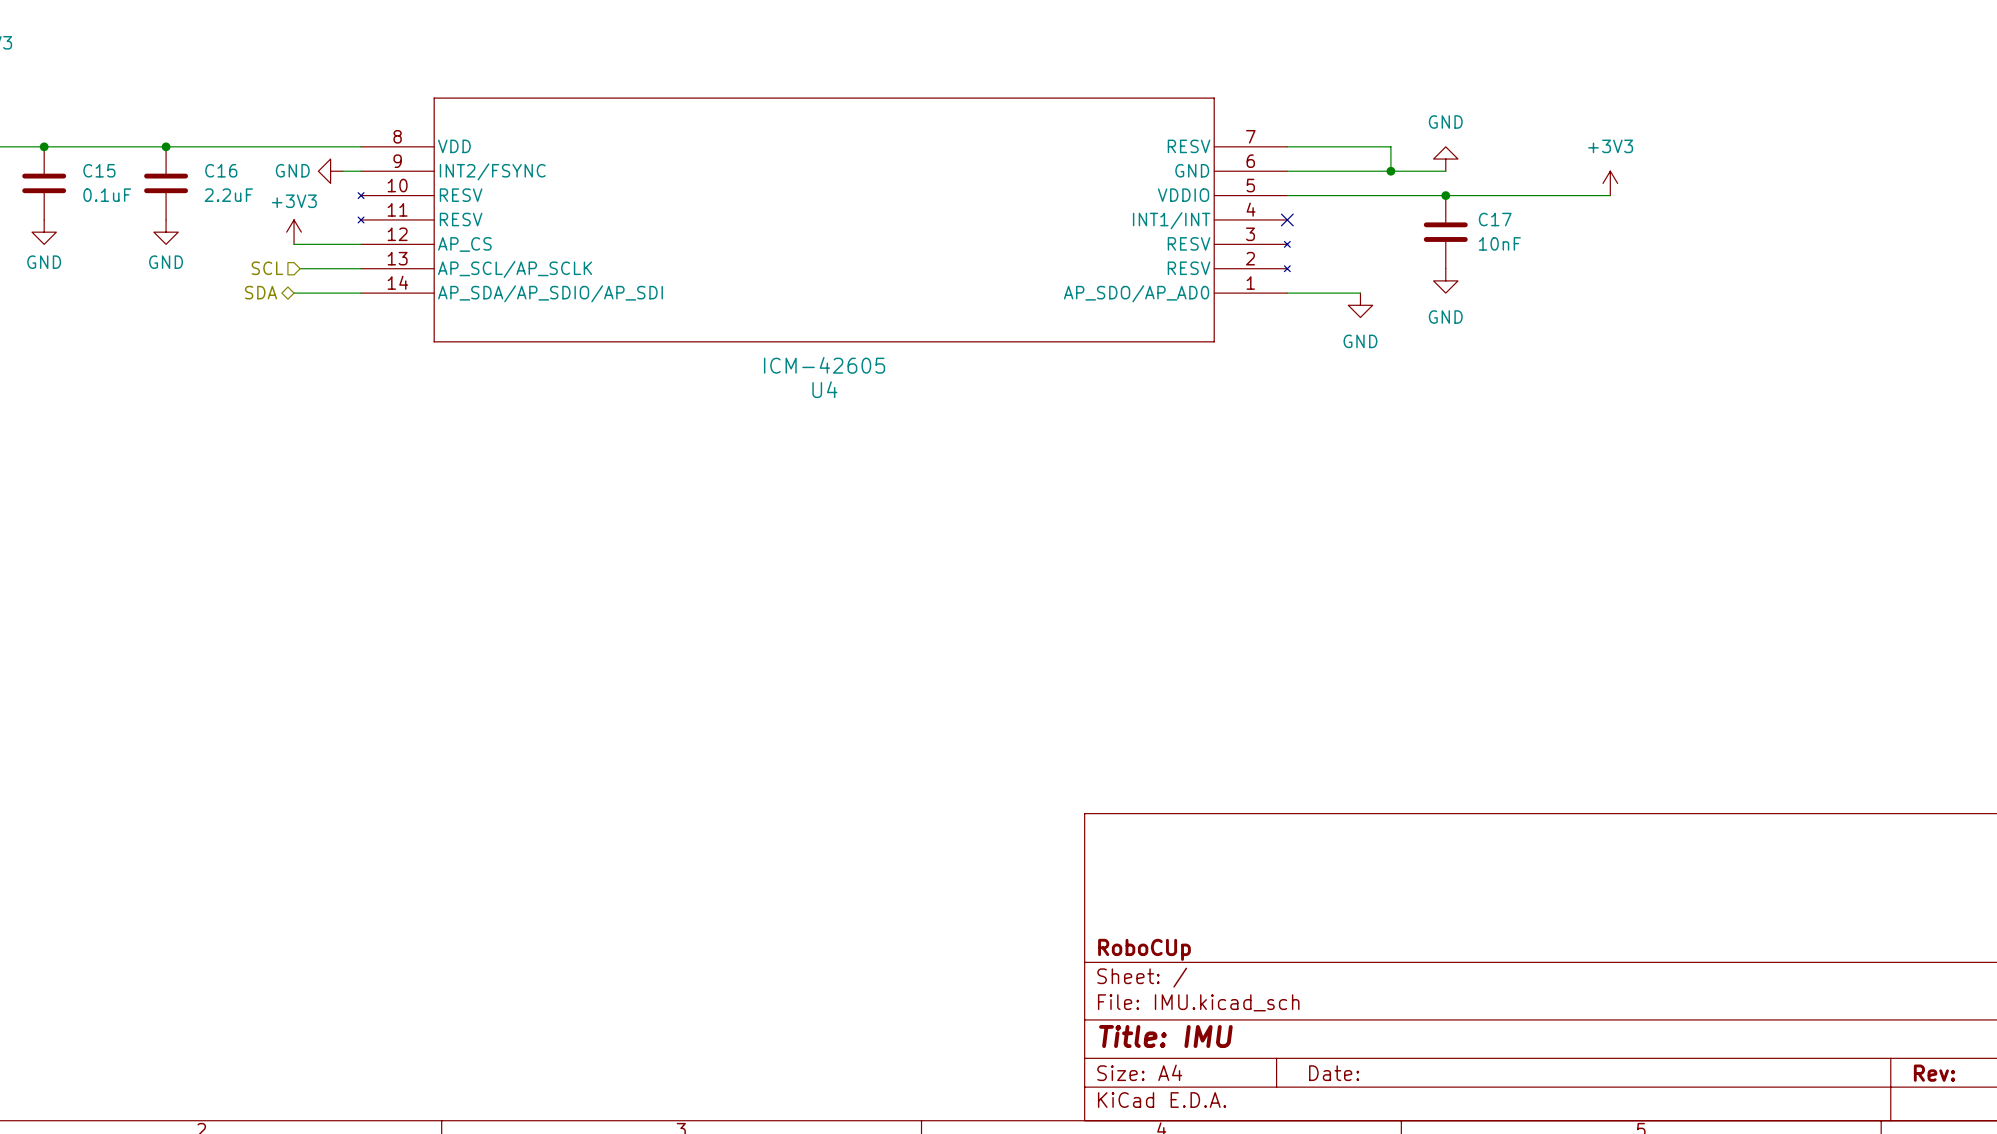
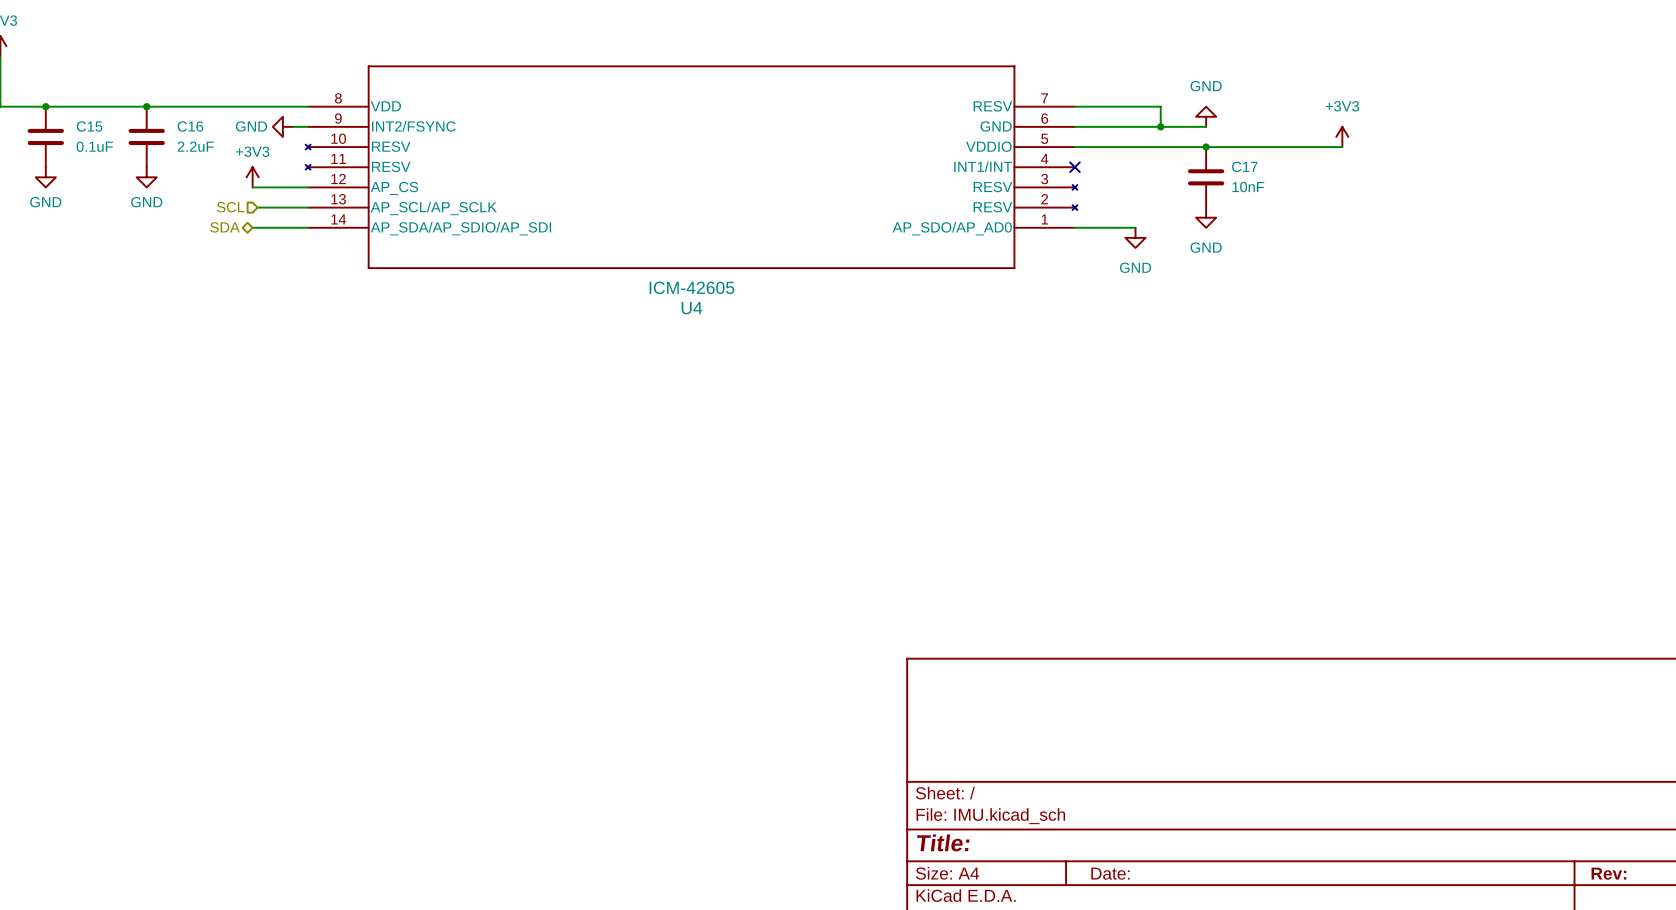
title block: RoboCUp (1144, 949) -> none
title block: Title: IMU (1165, 1036) -> Title: (943, 842)

